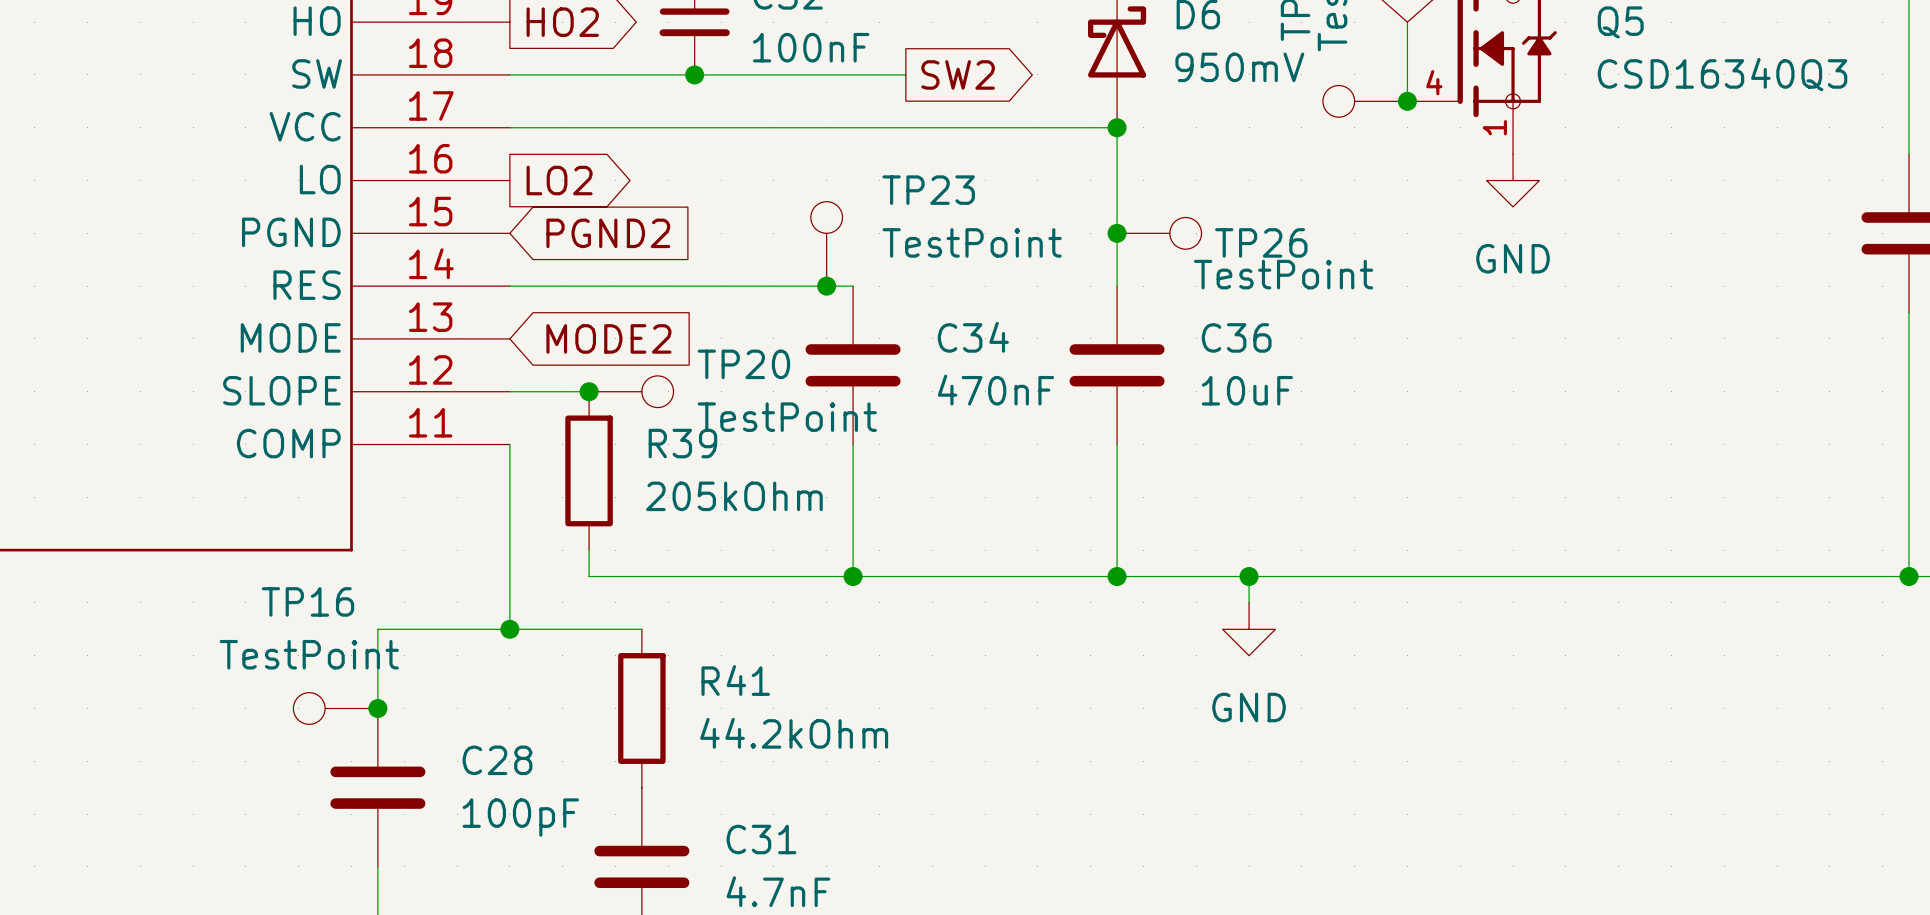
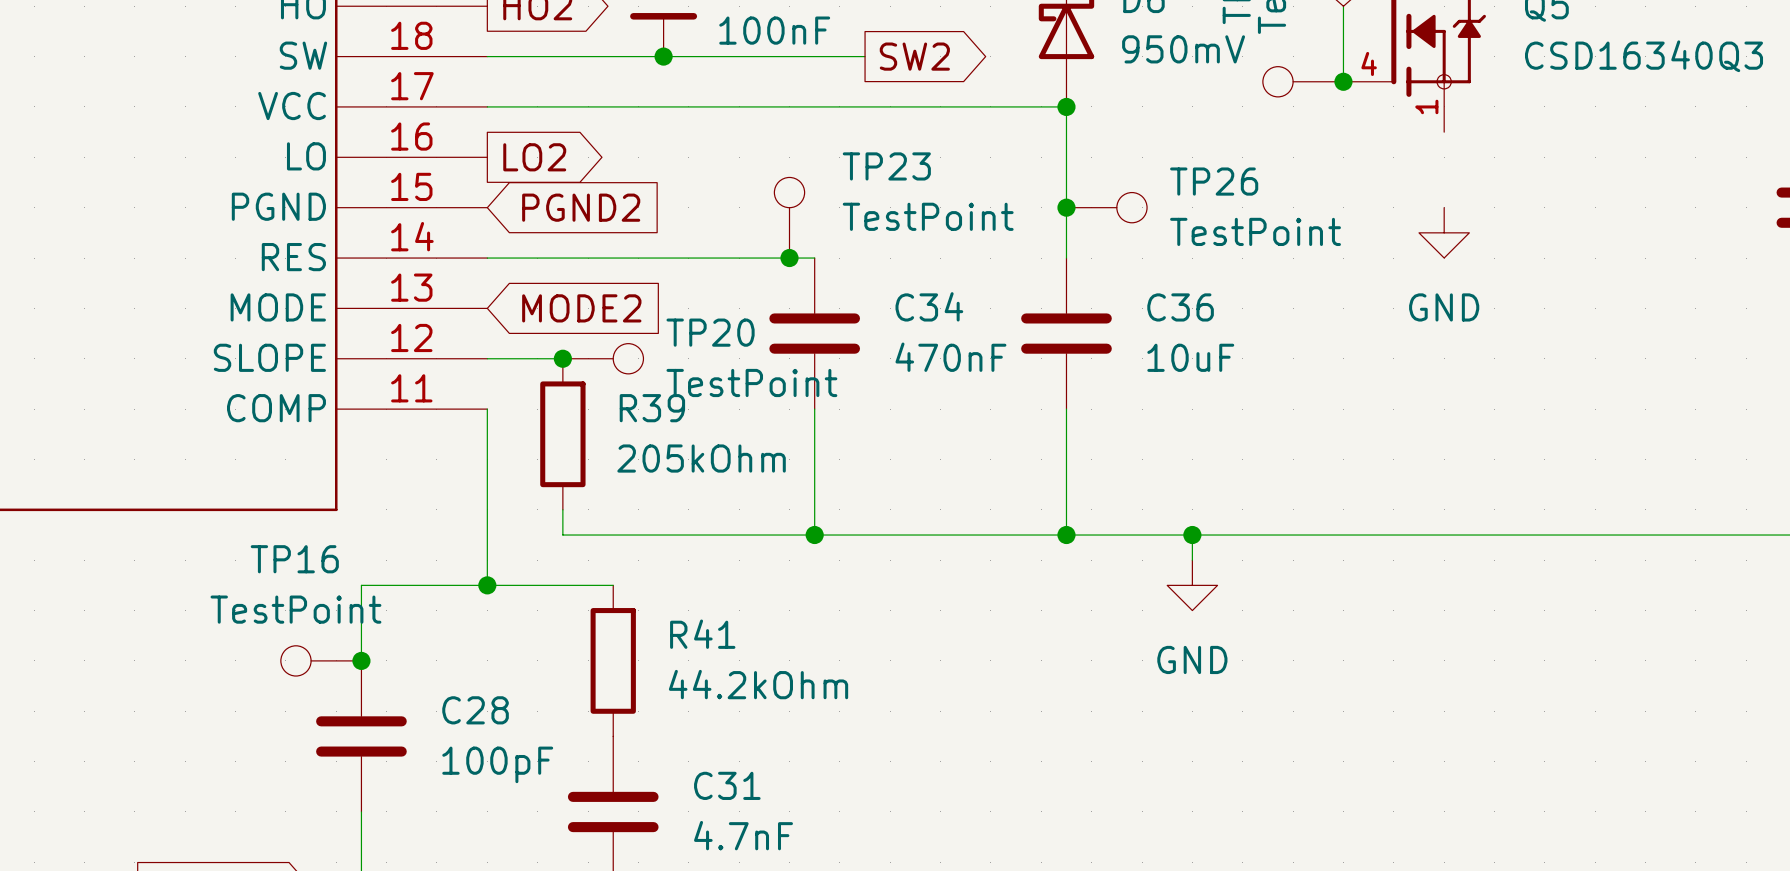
power symbol position: GND (1513, 180) -> GND (1444, 232)
TP26 name position: TP26 (1261, 242) -> TP26 (1214, 181)
TP26 value position: TestPoint (1283, 274) -> TestPoint (1255, 231)

